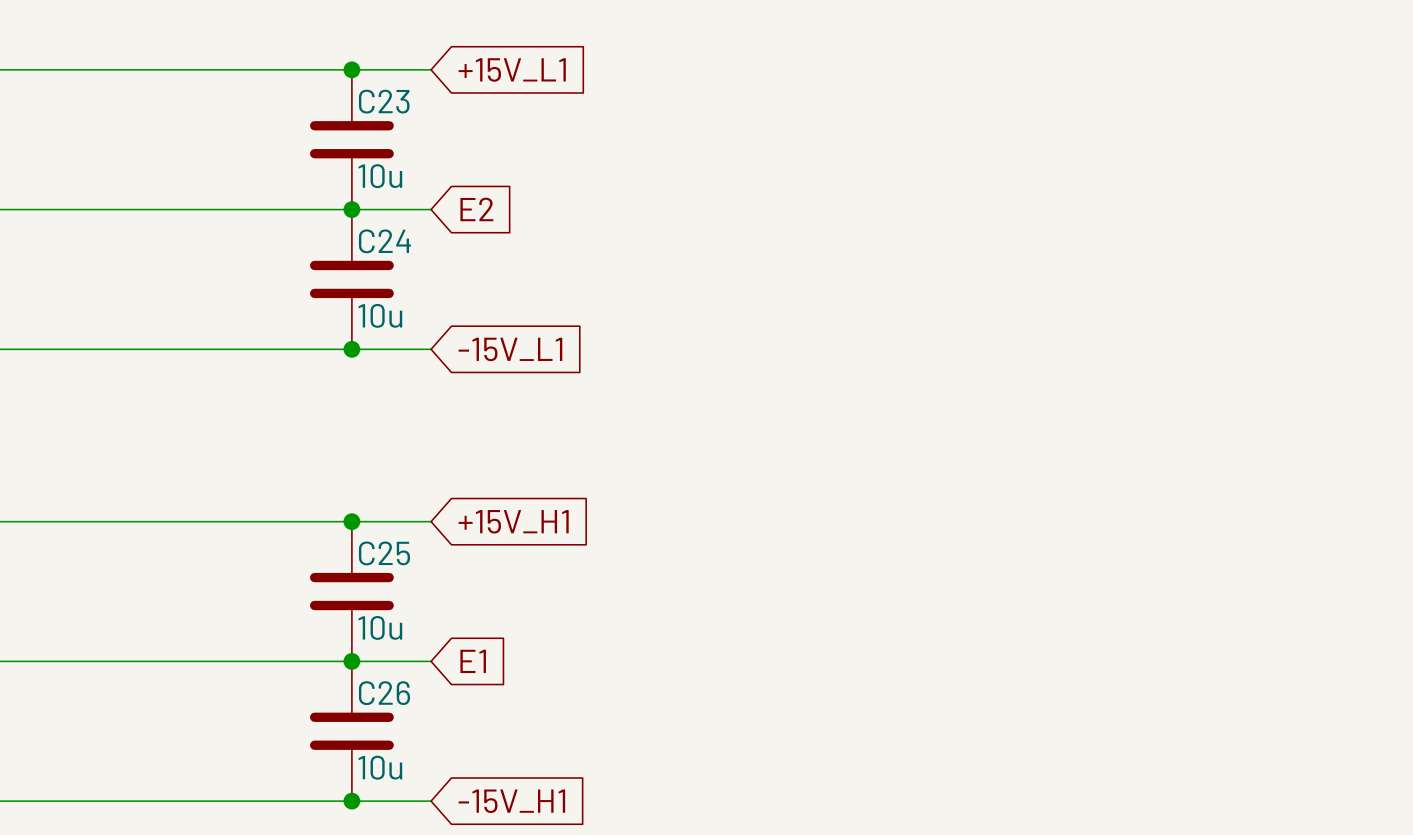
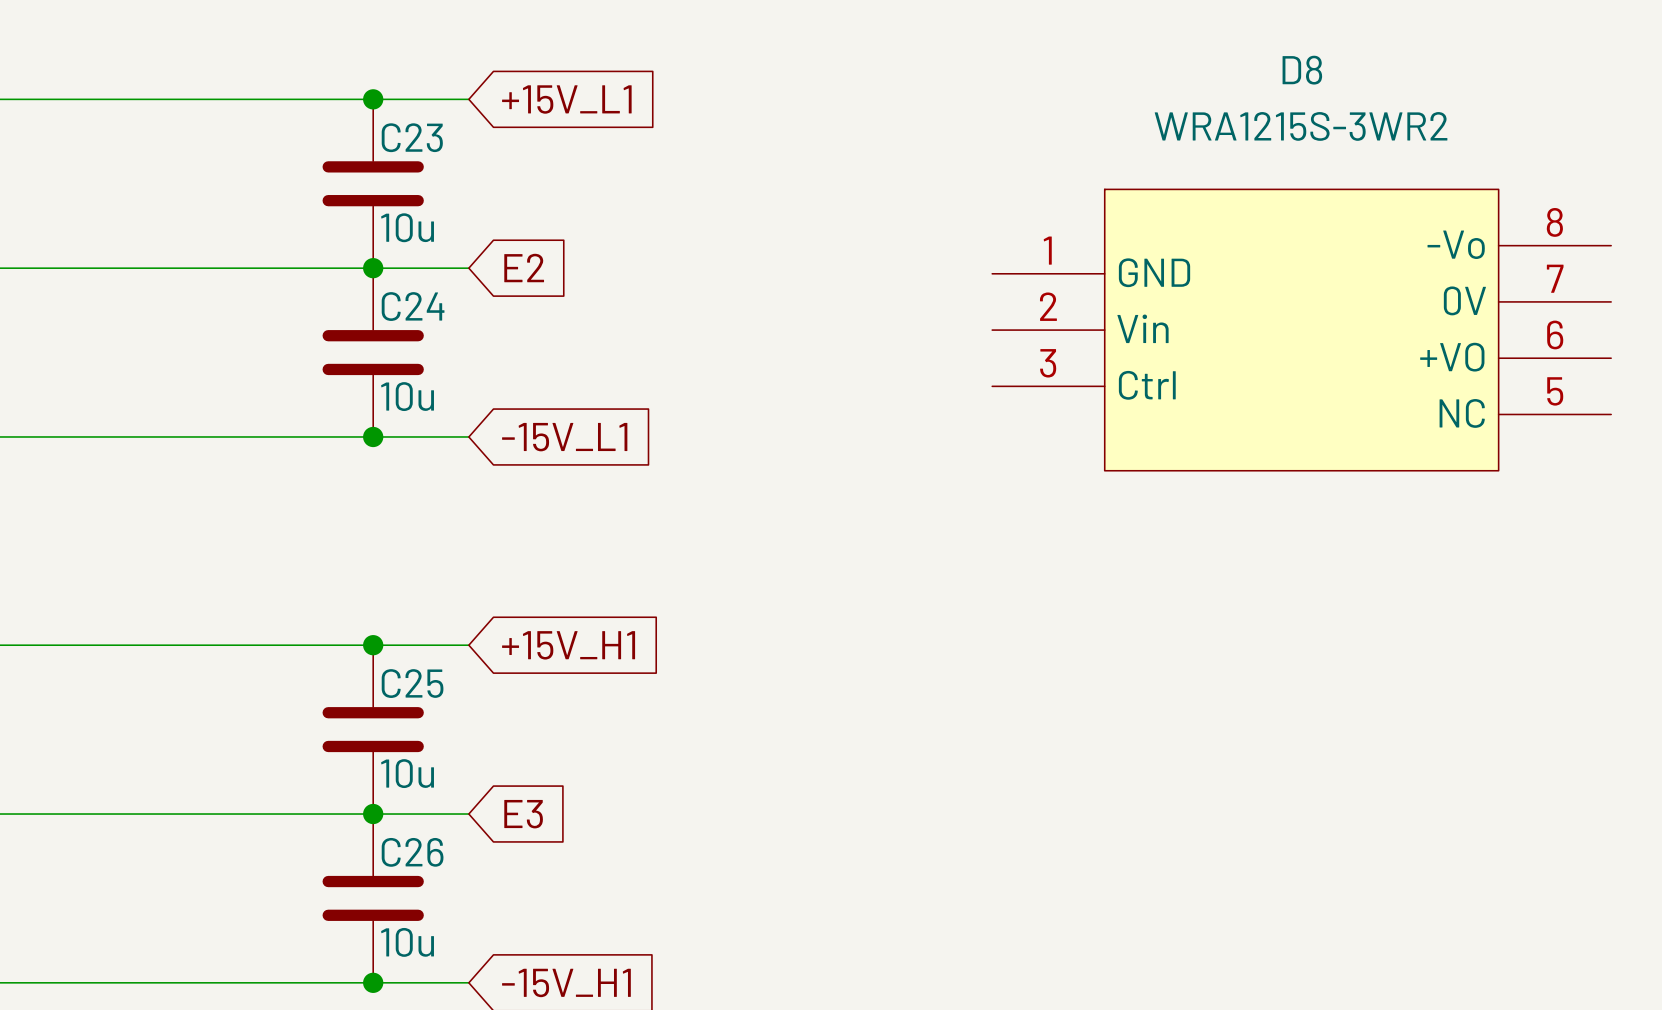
D8: none -> WRA1215S-3WR2 (1301, 330)
global label: E1 (473, 661) -> E3 (523, 814)

